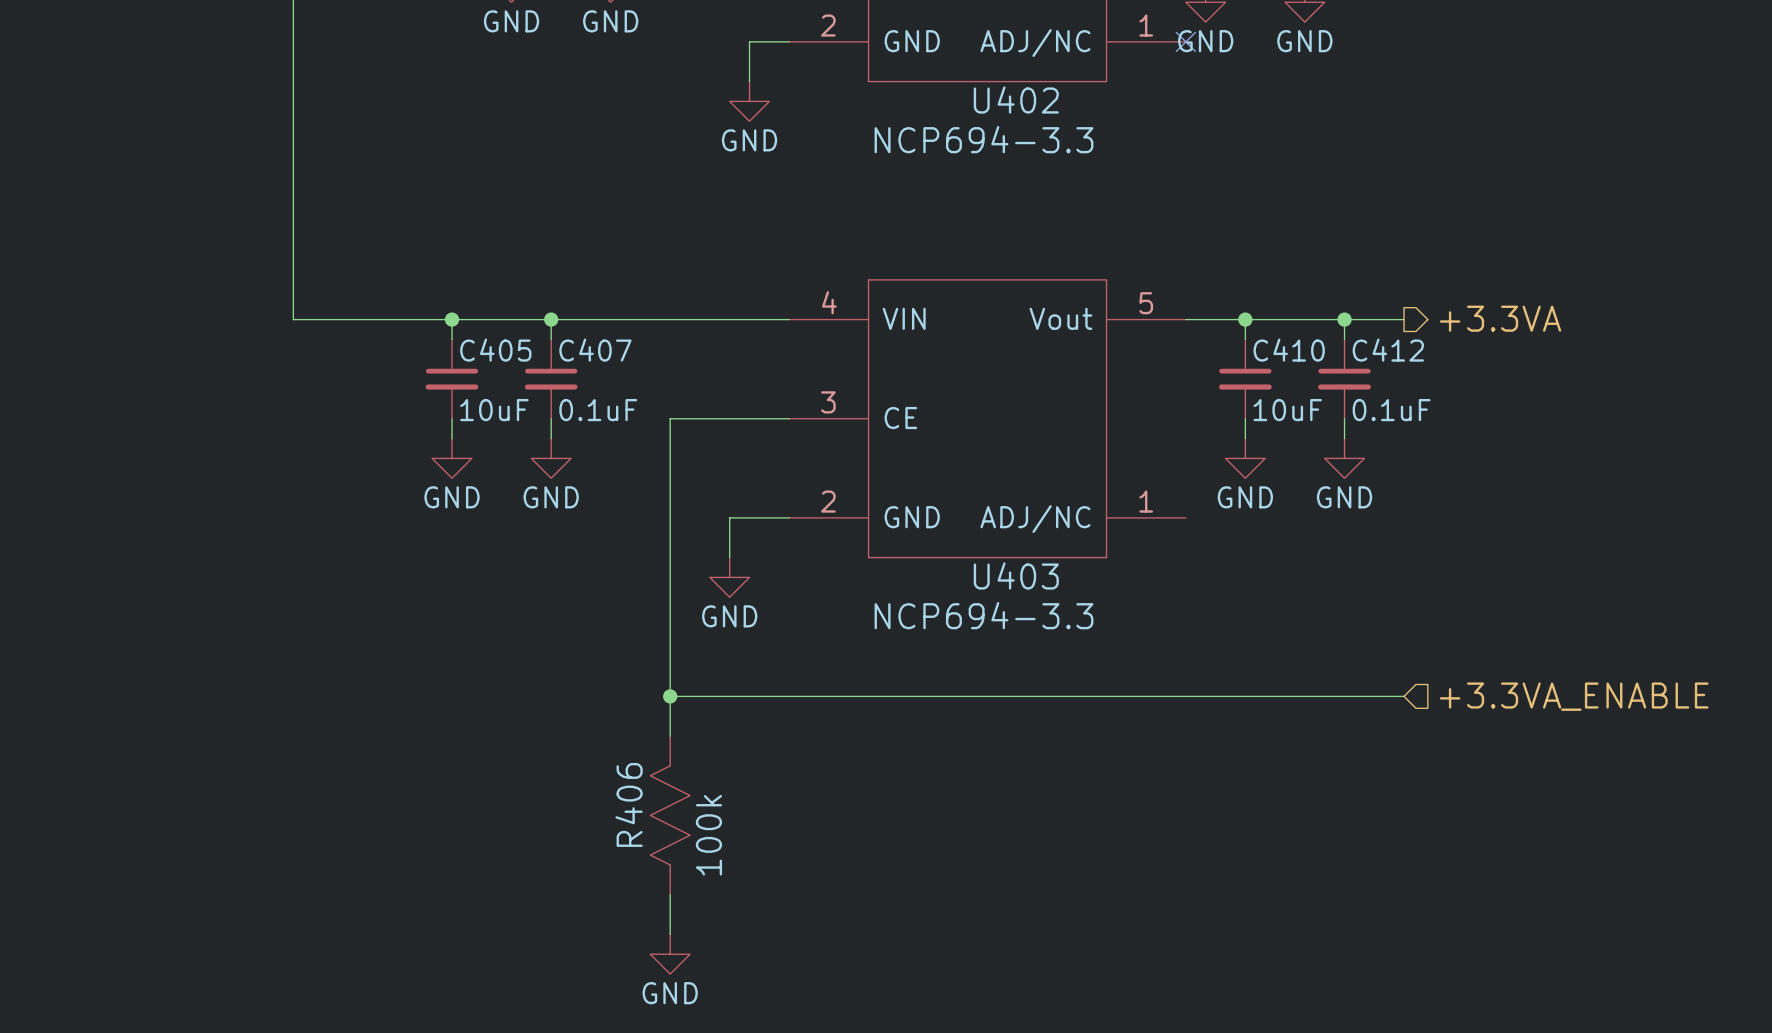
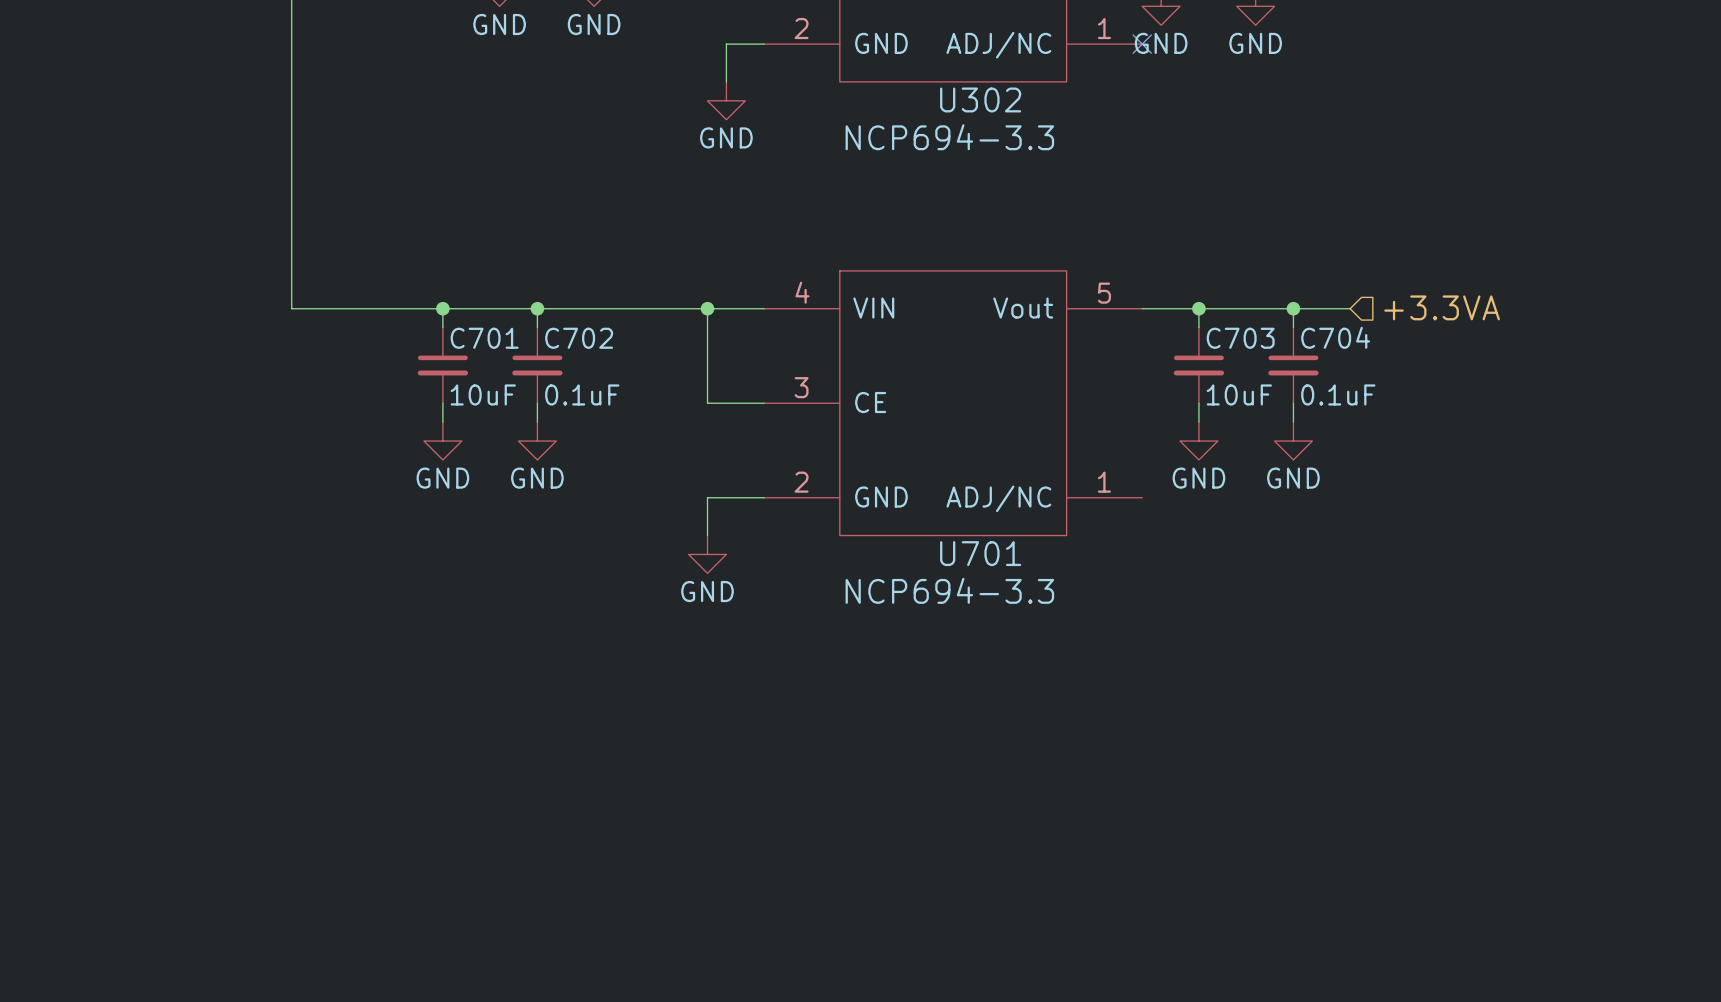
U402 name: U402 (1016, 99) -> U302 (980, 99)
hierarchical label shape: output (1500, 318) -> input (1442, 307)
junction: none -> (707, 308)
C405 name: C405 (495, 350) -> C701 (484, 338)
C407 name: C407 (595, 350) -> C702 (579, 338)
C410 name: C410 (1289, 350) -> C703 (1240, 338)
C412 name: C412 (1388, 350) -> C704 (1335, 337)
wire: (729, 418) (670, 418) (670, 736) -> (707, 403) (707, 308)
U403 name: U403 (1016, 575) -> U701 (980, 553)
wire: (670, 696) (1404, 696) -> none
junction: (670, 696) -> none
hierarchical label: +3.3VA_ENABLE (1574, 696) -> none
R406: 100k (670, 815) -> none
wire: (670, 894) (670, 934) -> none
power symbol: GND (670, 954) -> none

